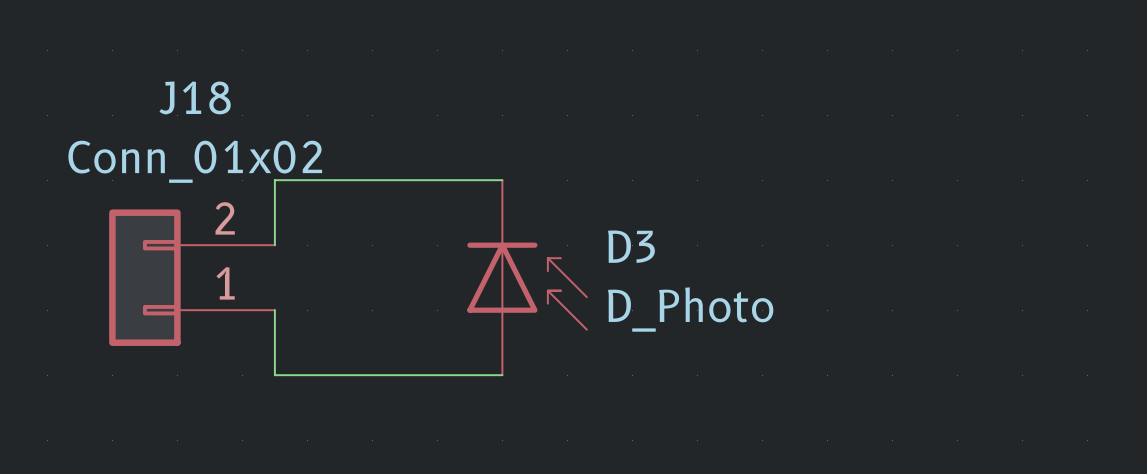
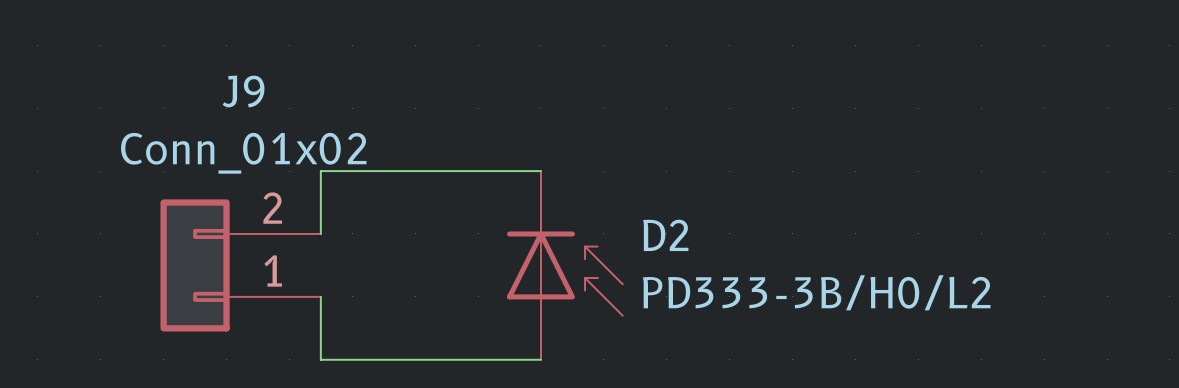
J18 name: J18 (195, 97) -> J9 (243, 91)
D3 name: D3 (631, 246) -> D2 (665, 235)
D3 value: D_Photo (690, 309) -> PD333-3B/H0/L2 (816, 292)

